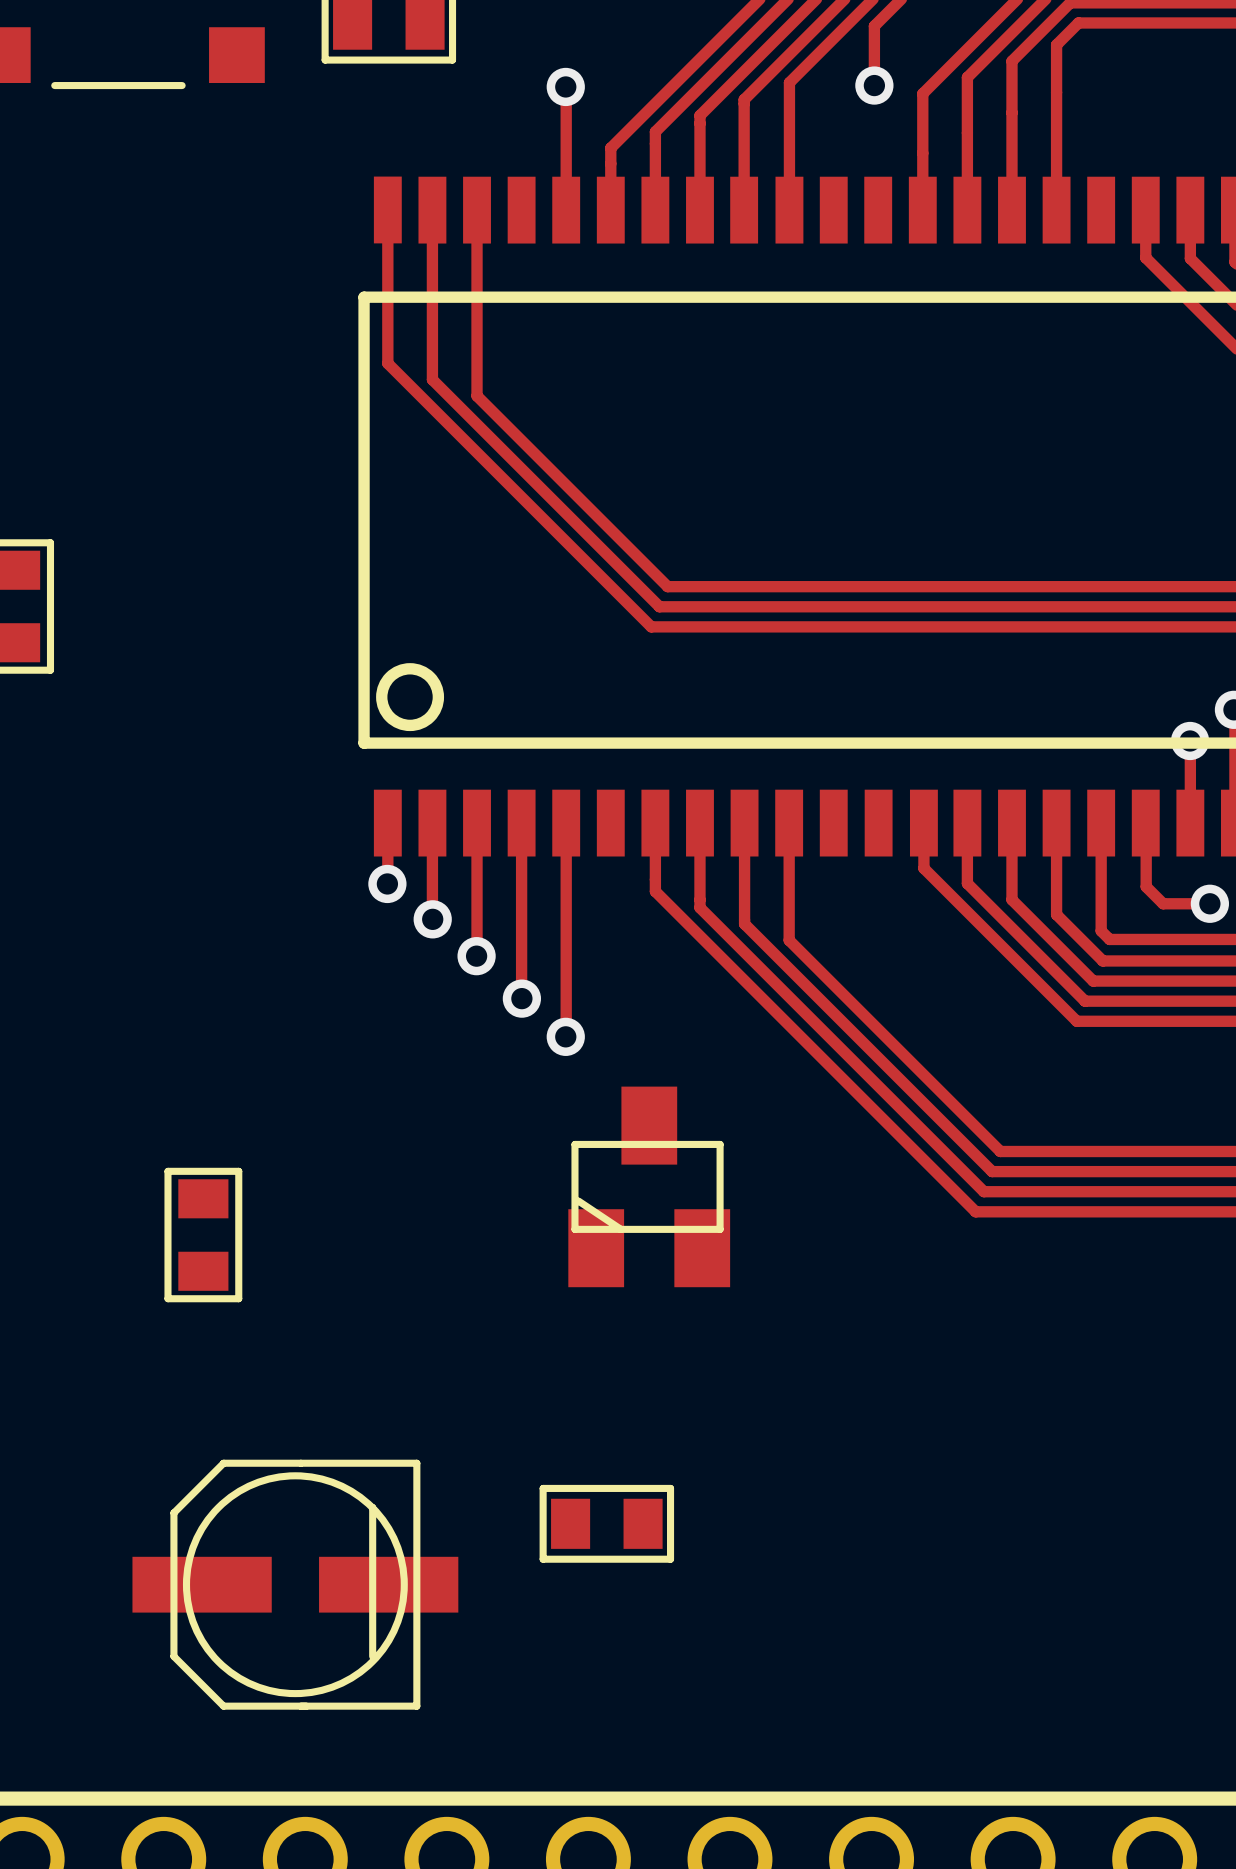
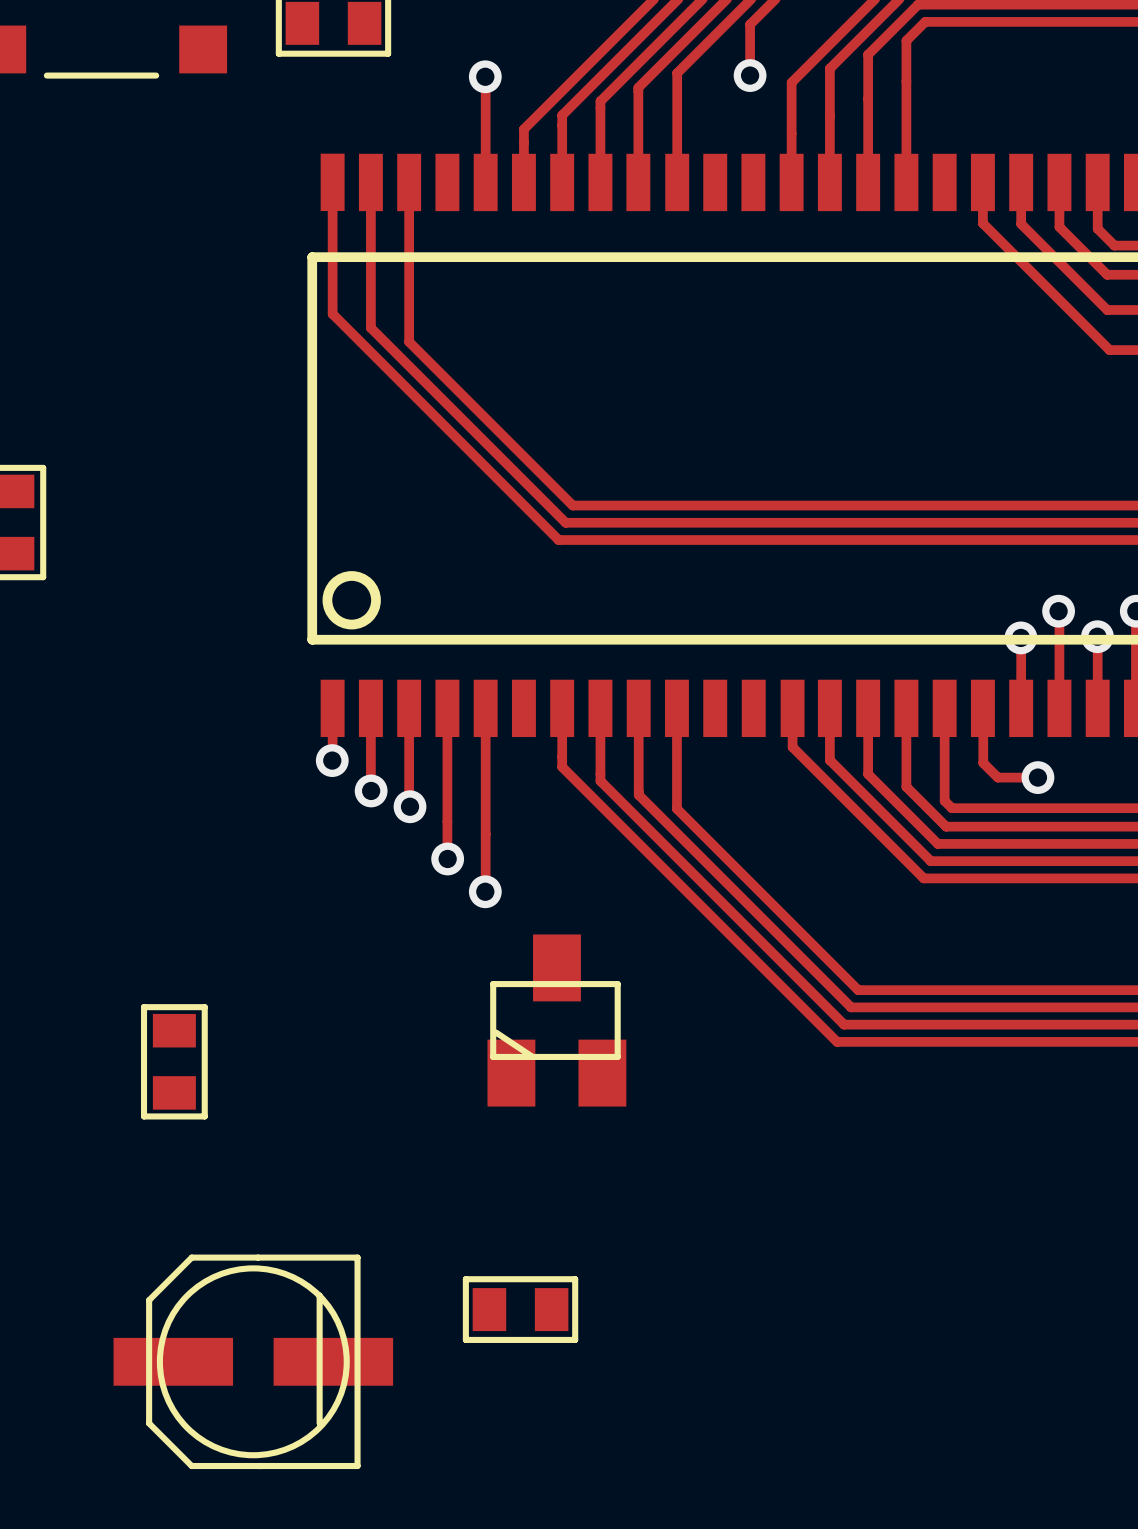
via position: (476, 956) -> (410, 806)

